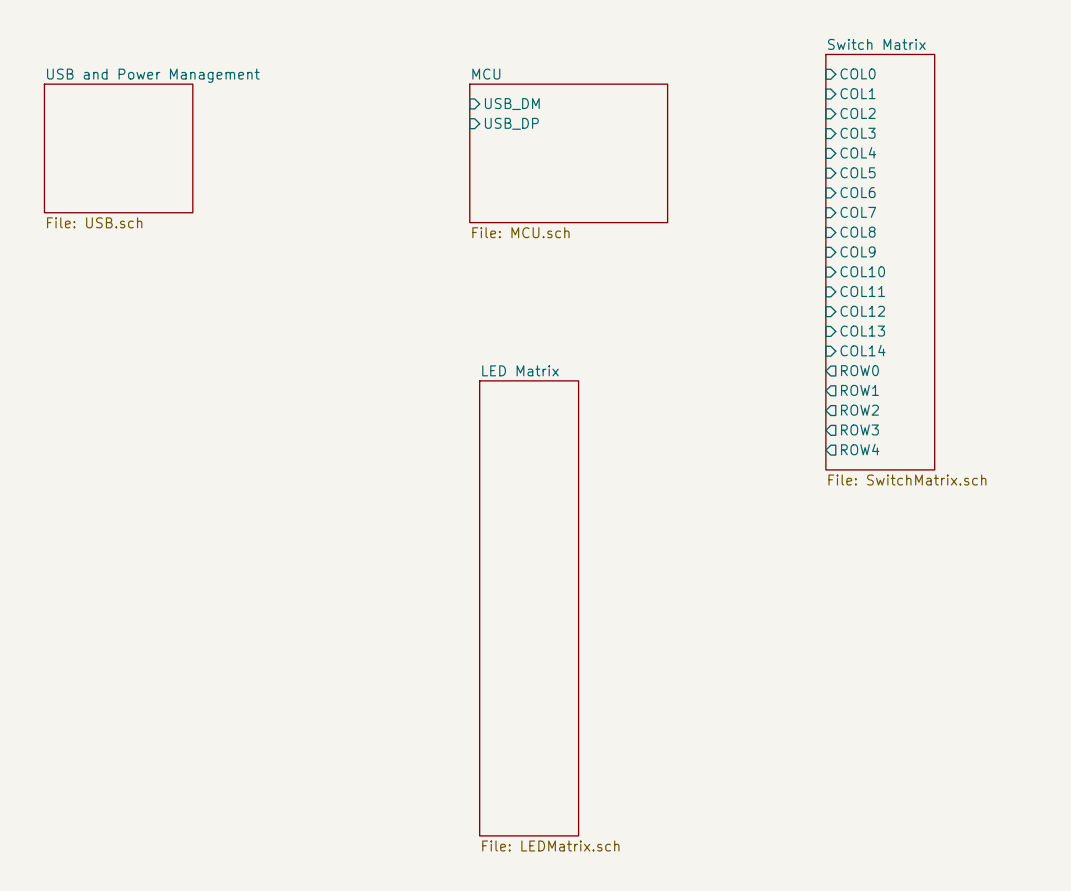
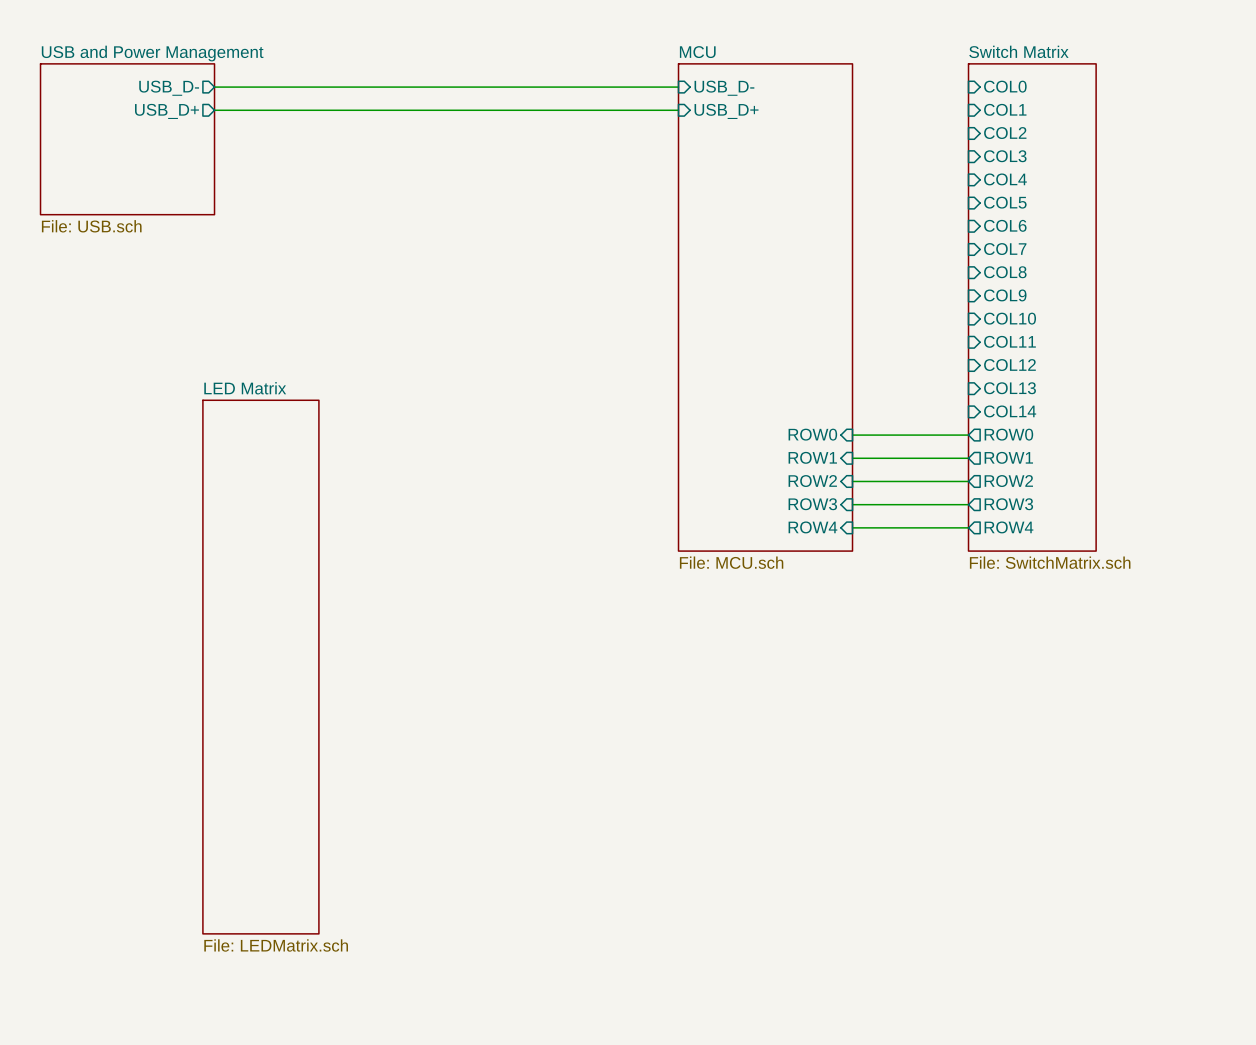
sheet pin: none -> USB_D- (169, 88)
wire: none -> (214, 87) (678, 87)
sheet pin: none -> USB_D- (724, 88)
sheet pin: none -> USB_D+ (166, 111)
wire: none -> (214, 110) (678, 110)
sheet pin: none -> USB_D+ (726, 111)
sheet pin: USB_DM (512, 104) -> none
sheet pin: USB_DP (511, 123) -> none
sheet USB and Power Management position: (118, 148) -> (127, 139)
sheet MCU: File: MCU.sch (568, 153) -> none
sheet MCU: none -> File: MCU.sch (765, 307)
sheet pin: none -> ROW0 (812, 434)
wire: none -> (852, 435) (968, 435)
sheet pin: none -> ROW1 (812, 457)
wire: none -> (852, 458) (968, 458)
sheet pin: none -> ROW2 (812, 481)
wire: none -> (852, 481) (968, 481)
sheet pin: none -> ROW3 (812, 504)
wire: none -> (852, 504) (968, 504)
sheet pin: none -> ROW4 (812, 527)
wire: none -> (852, 527) (968, 527)
sheet LED Matrix: none -> File: LEDMatrix.sch (260, 667)
sheet LED Matrix: File: LEDMatrix.sch (529, 608) -> none

